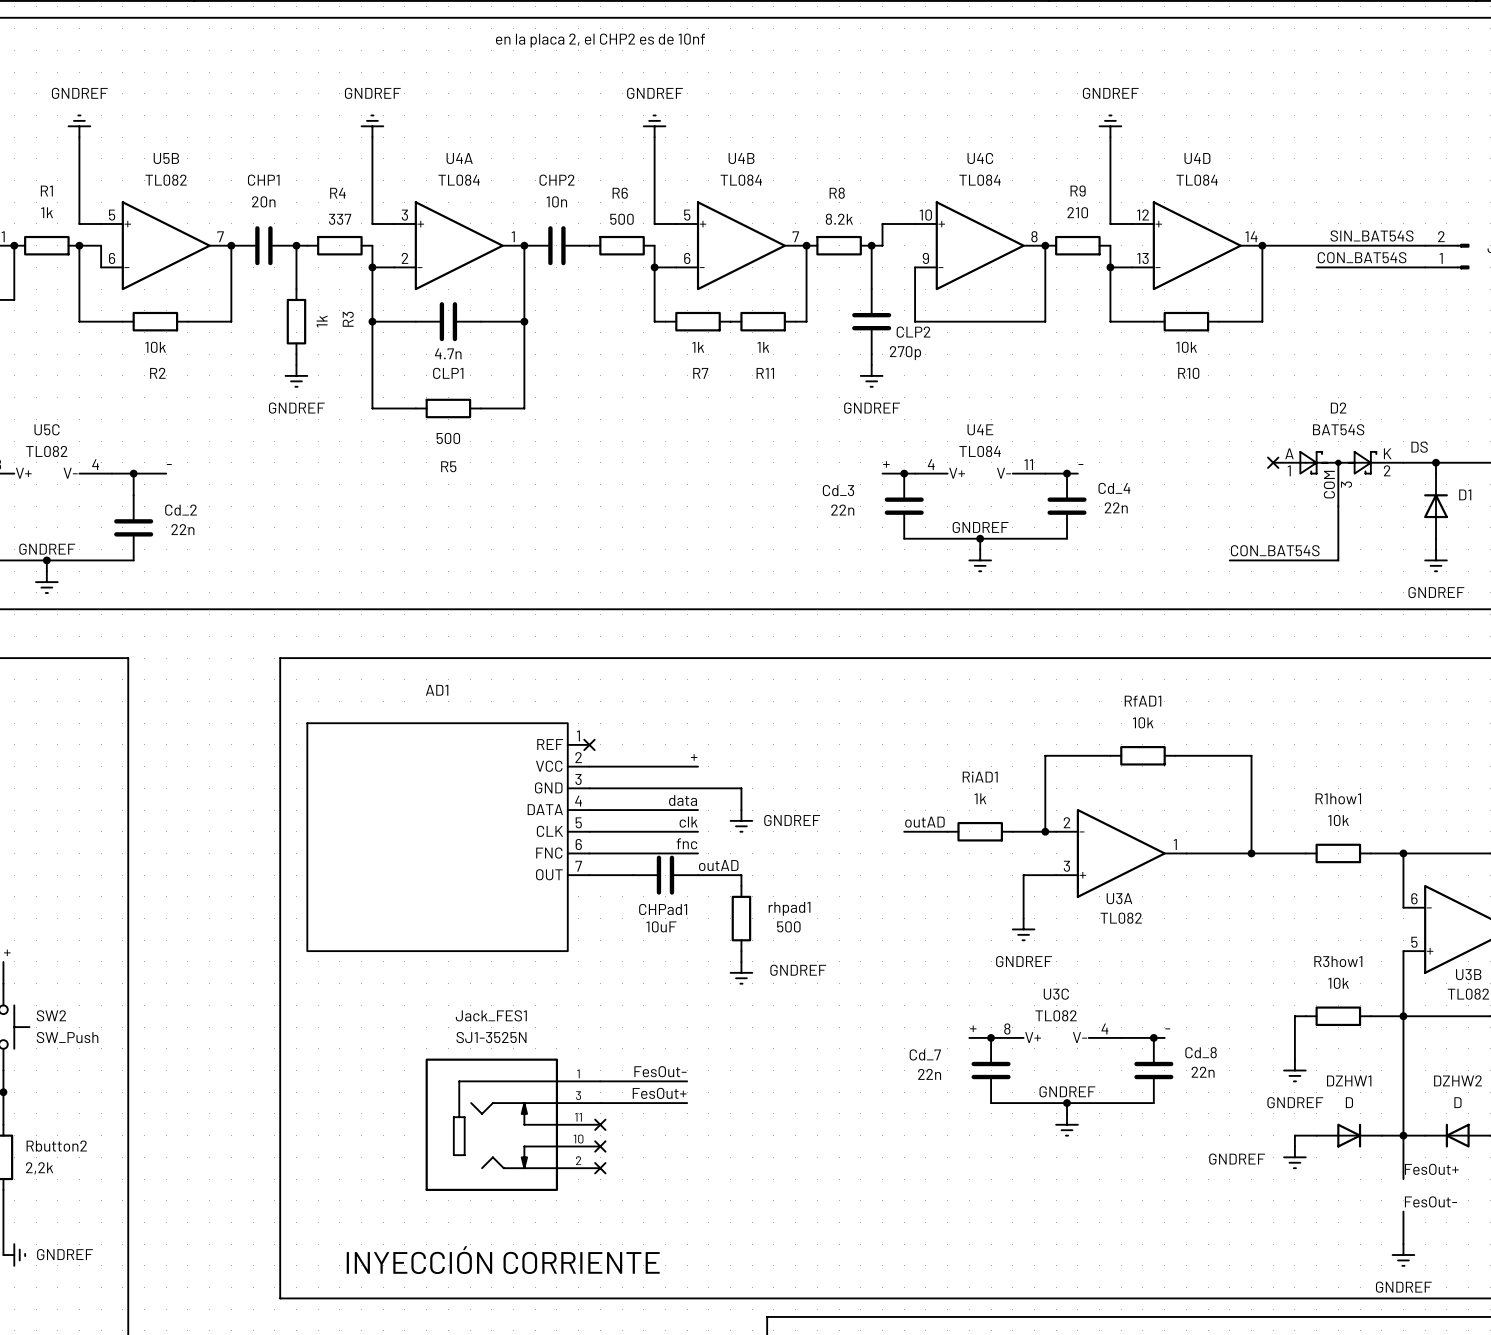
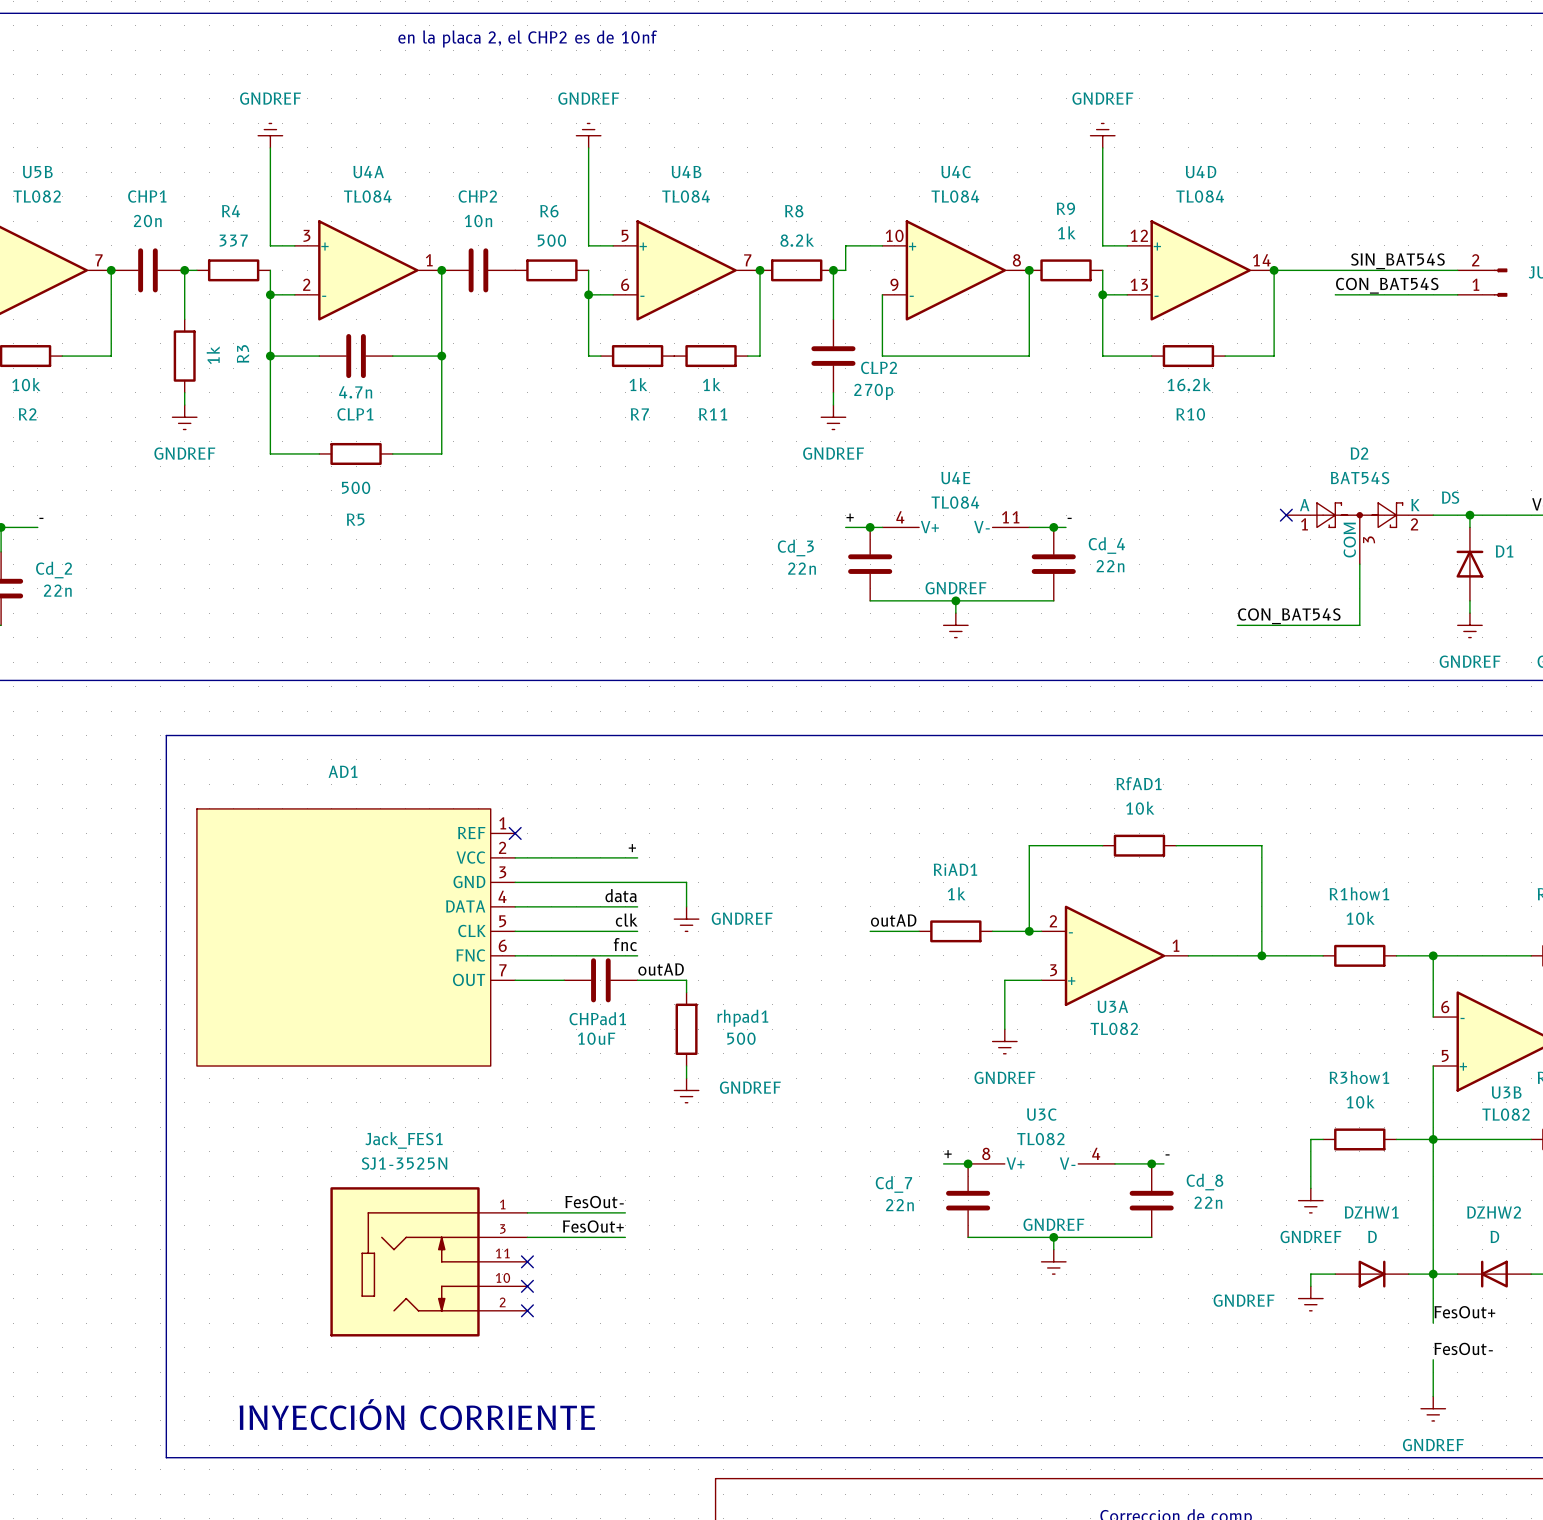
R9 value: 210 (1077, 212) -> 1k (1066, 232)
R10 value: 10k (1186, 347) -> 16.2k (1189, 384)

